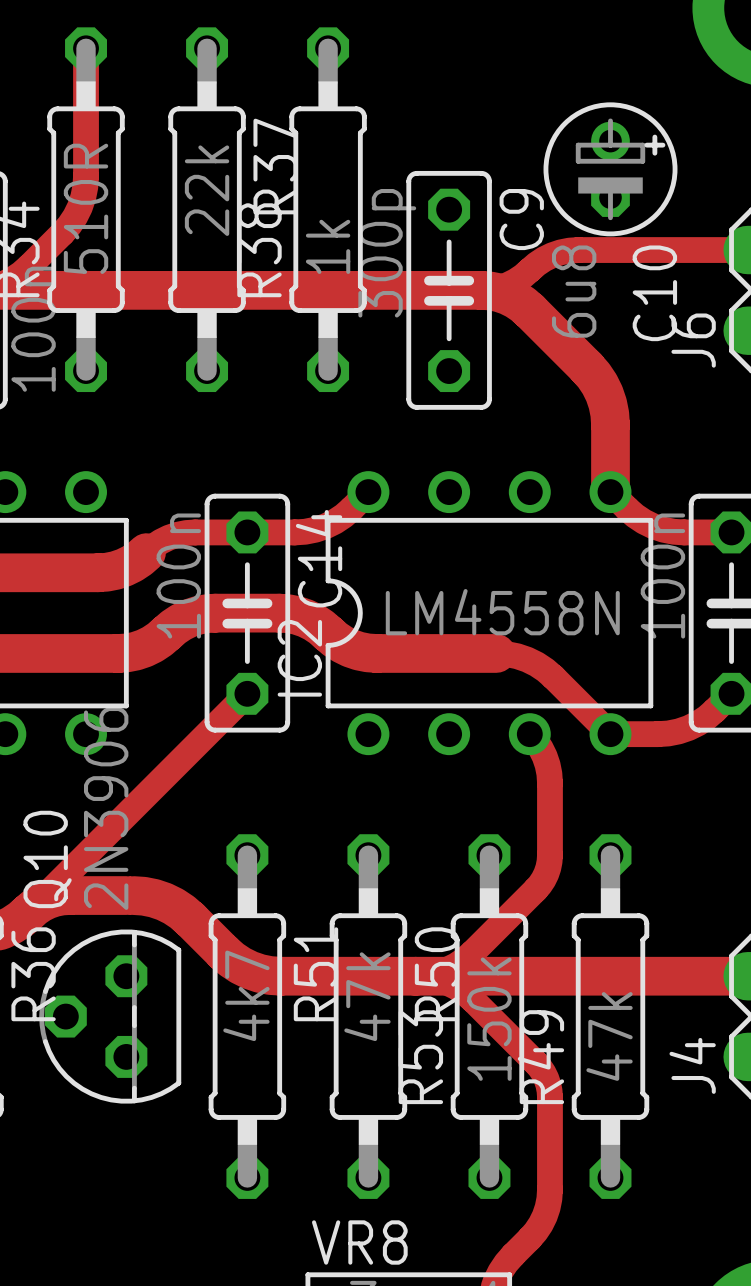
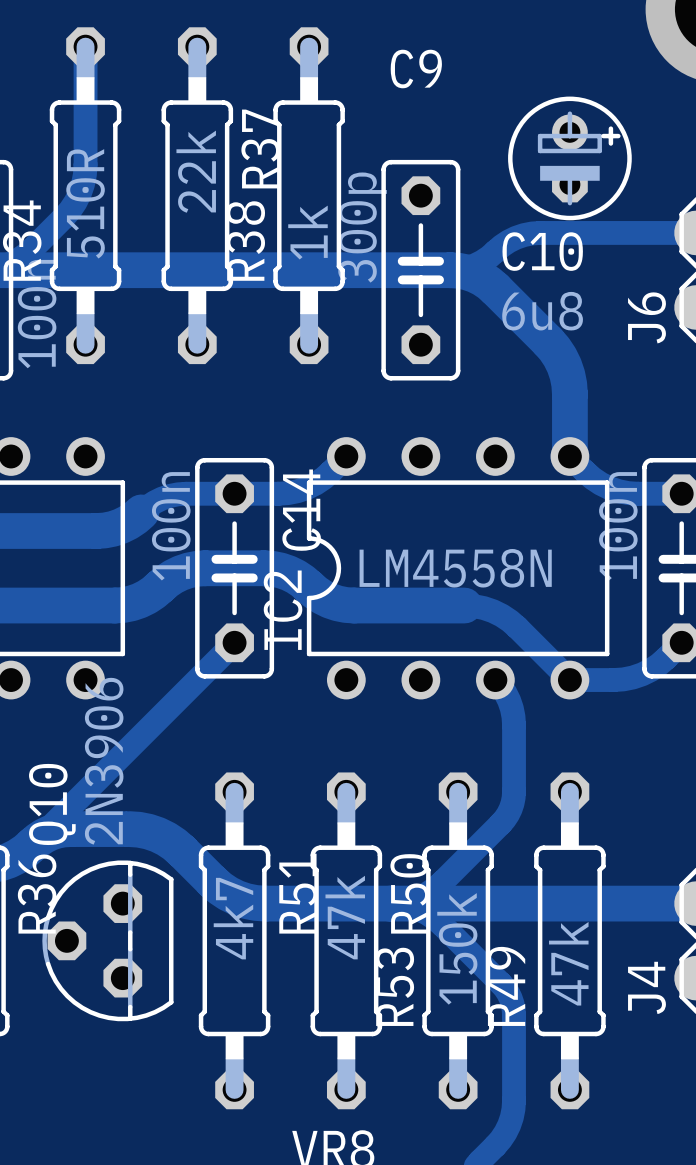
C9 name rotation: 0° (521, 219) -> 90° clockwise (416, 69)
C9 name position: C9 (521, 219) -> C9 (416, 69)
C10 value rotation: 0° (574, 291) -> 90° clockwise (542, 311)
C10 name rotation: 0° (654, 293) -> 90° clockwise (542, 251)

